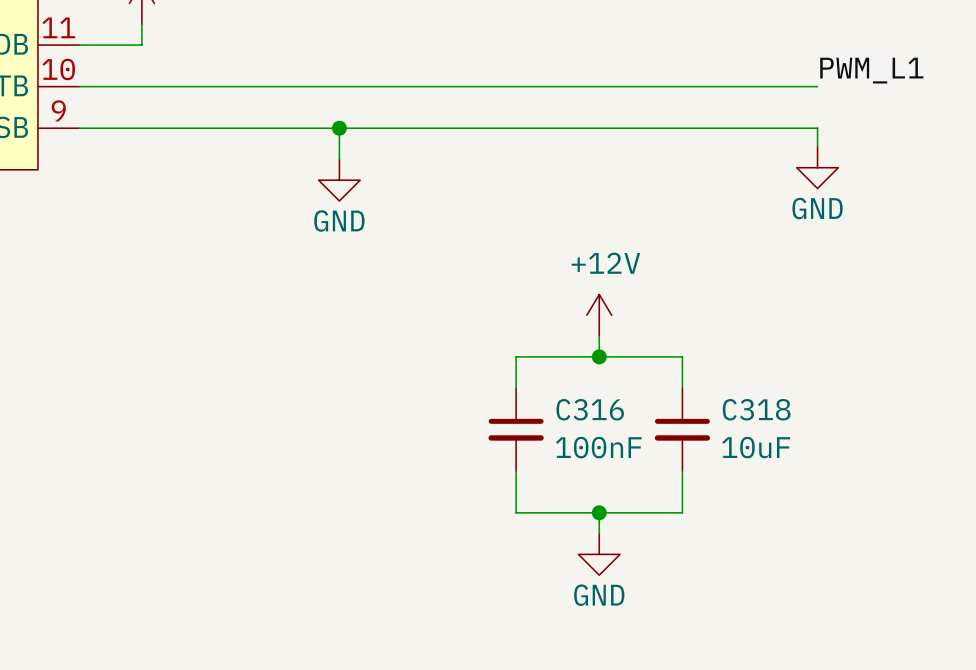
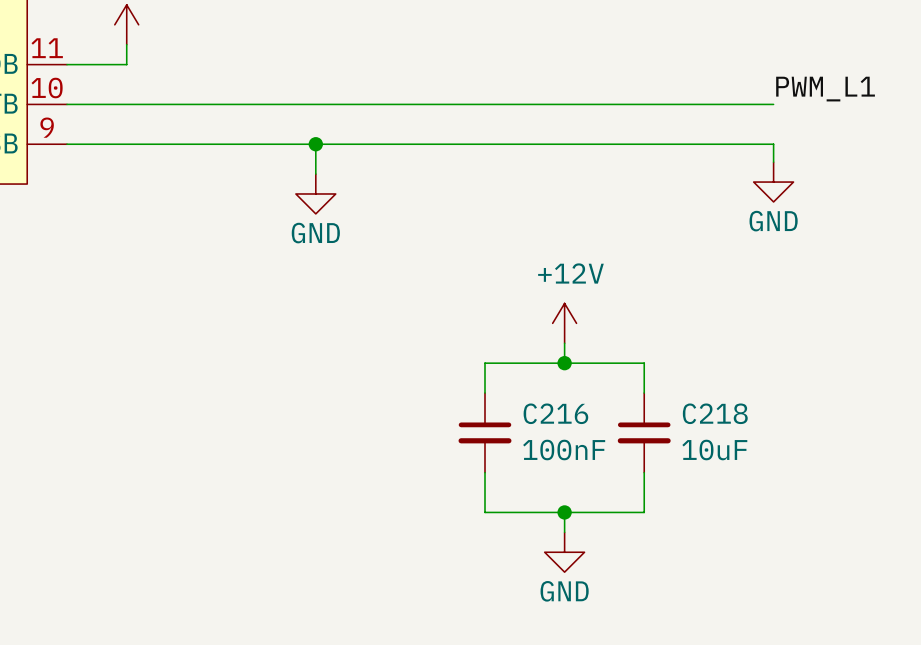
C316 name: C316 (590, 409) -> C216 (555, 413)
C318 name: C318 (756, 409) -> C218 (715, 413)

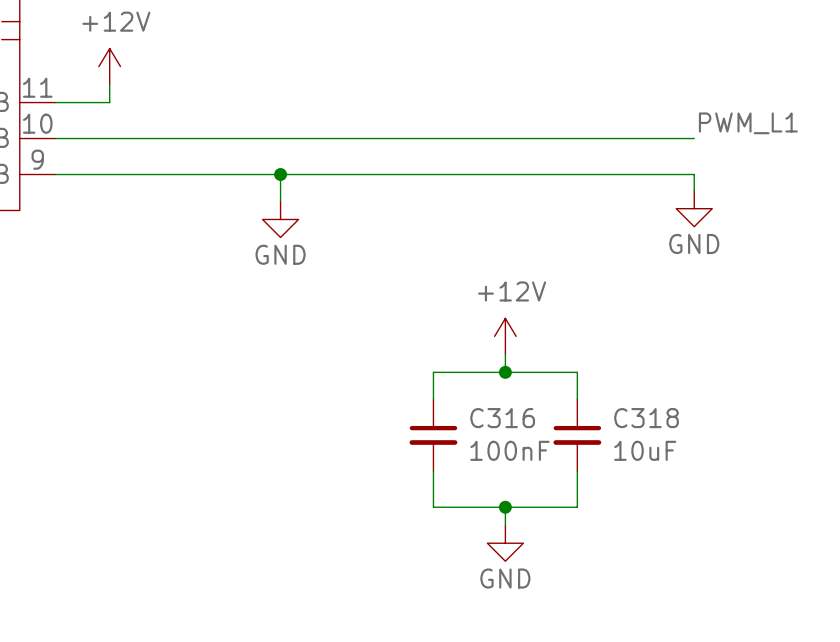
C216 name: C216 (555, 413) -> C316 (502, 418)
C218 name: C218 (715, 413) -> C318 (646, 418)

